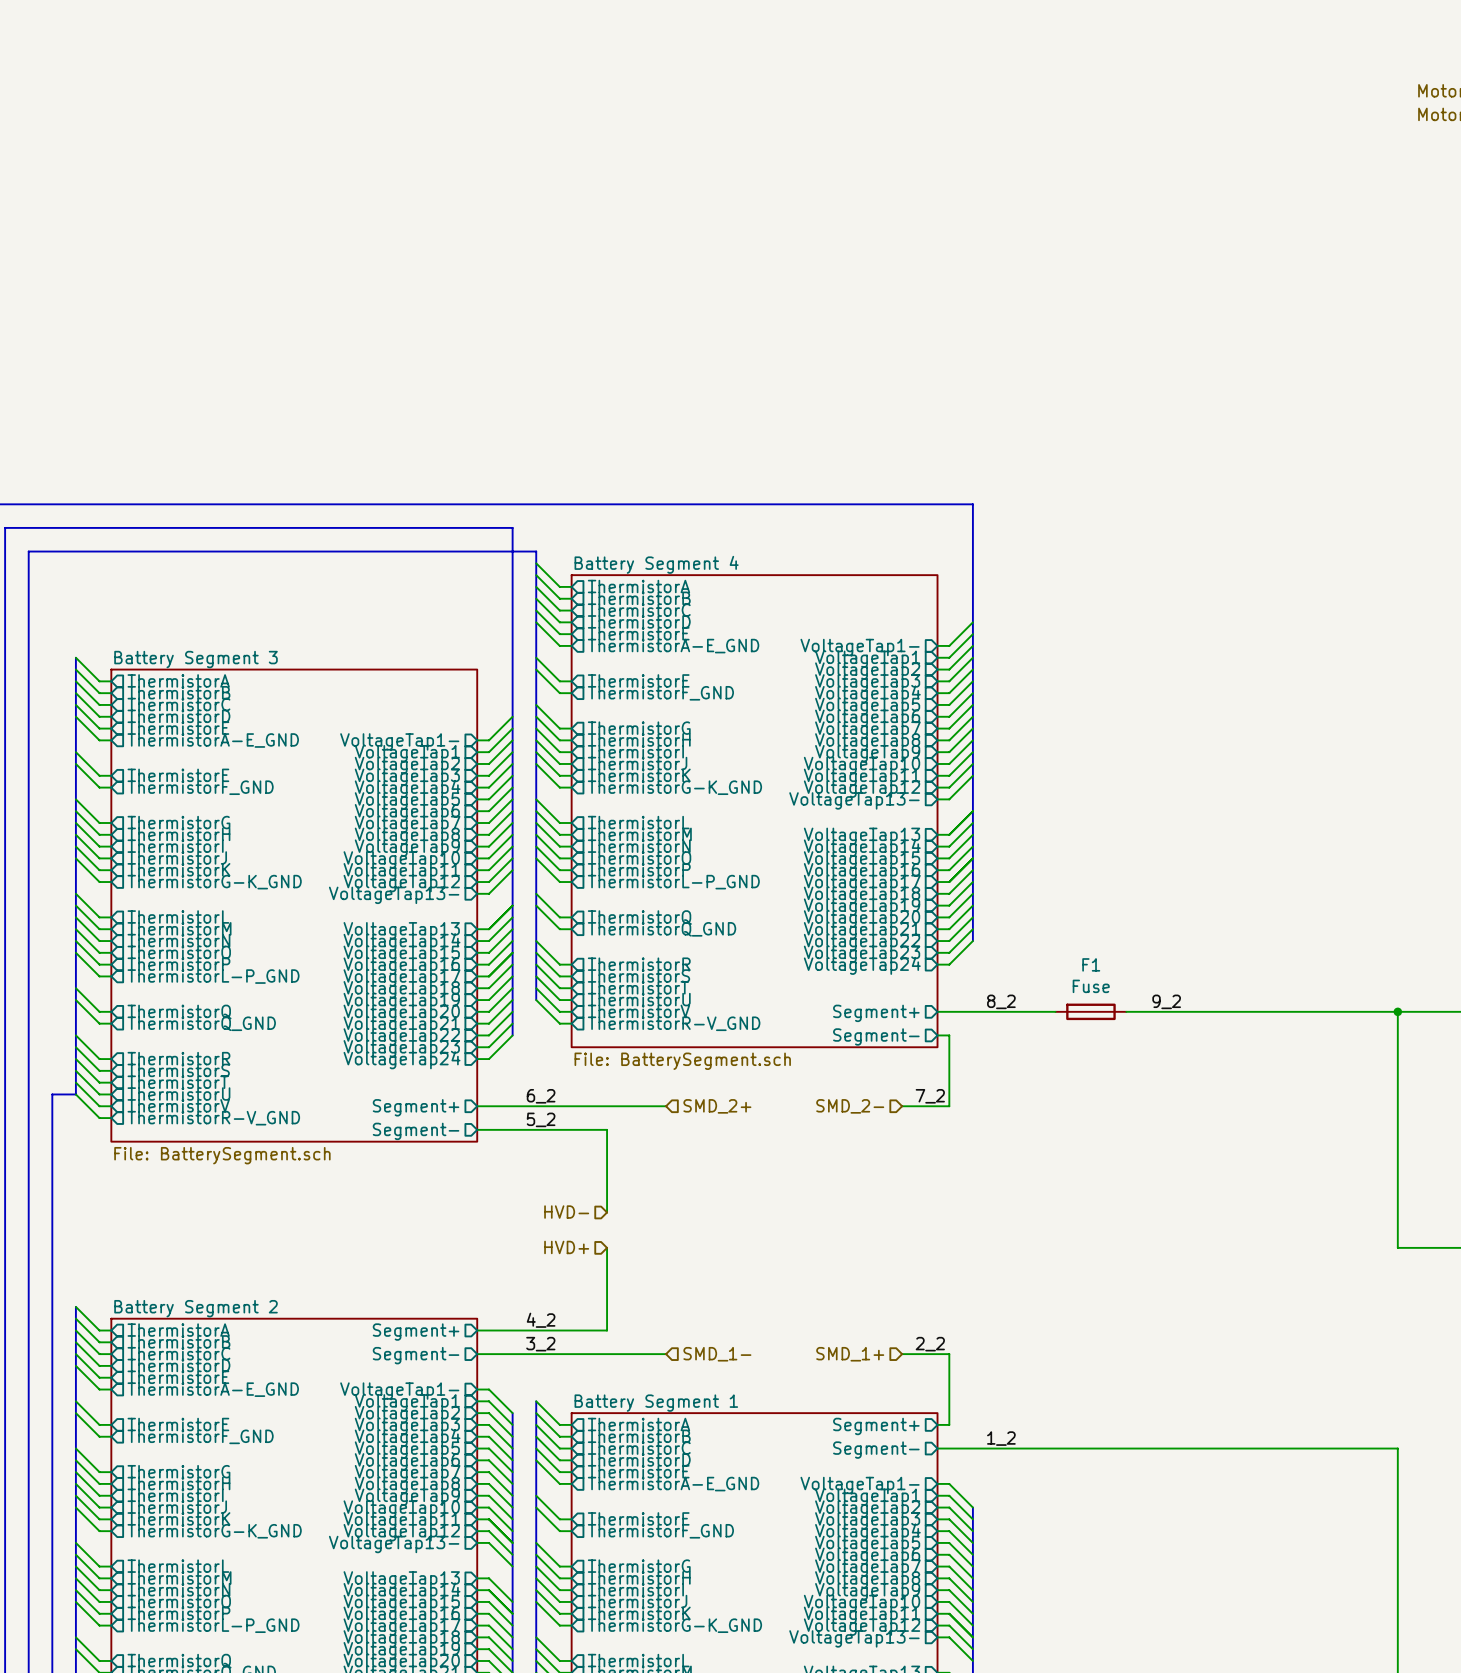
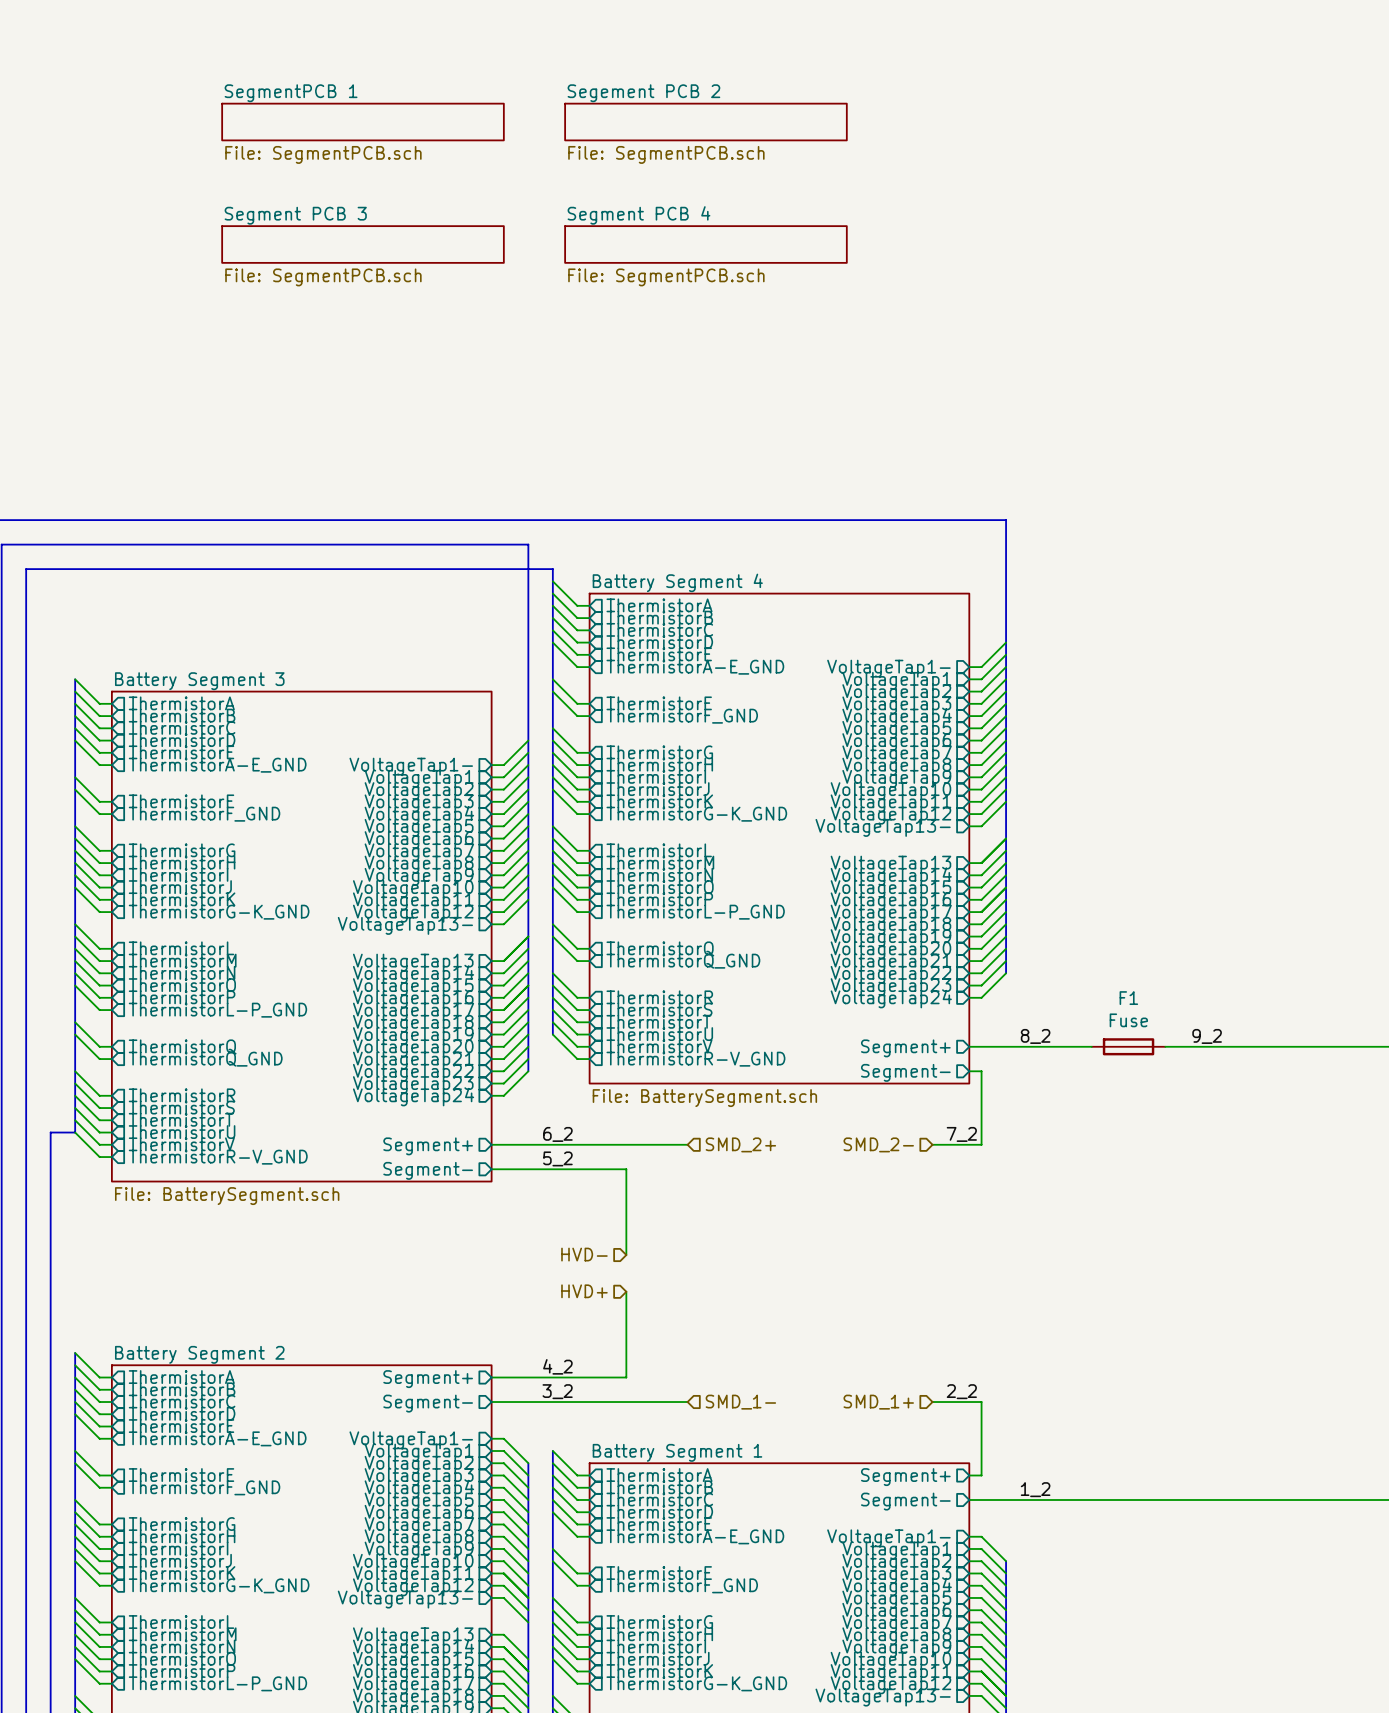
sheet SegmentPCB 1: none -> File: SegmentPCB.sch (363, 122)
sheet Segement PCB 2: none -> File: SegmentPCB.sch (705, 122)
sheet Segment PCB 3: none -> File: SegmentPCB.sch (363, 244)
sheet Segment PCB 4: none -> File: SegmentPCB.sch (705, 244)

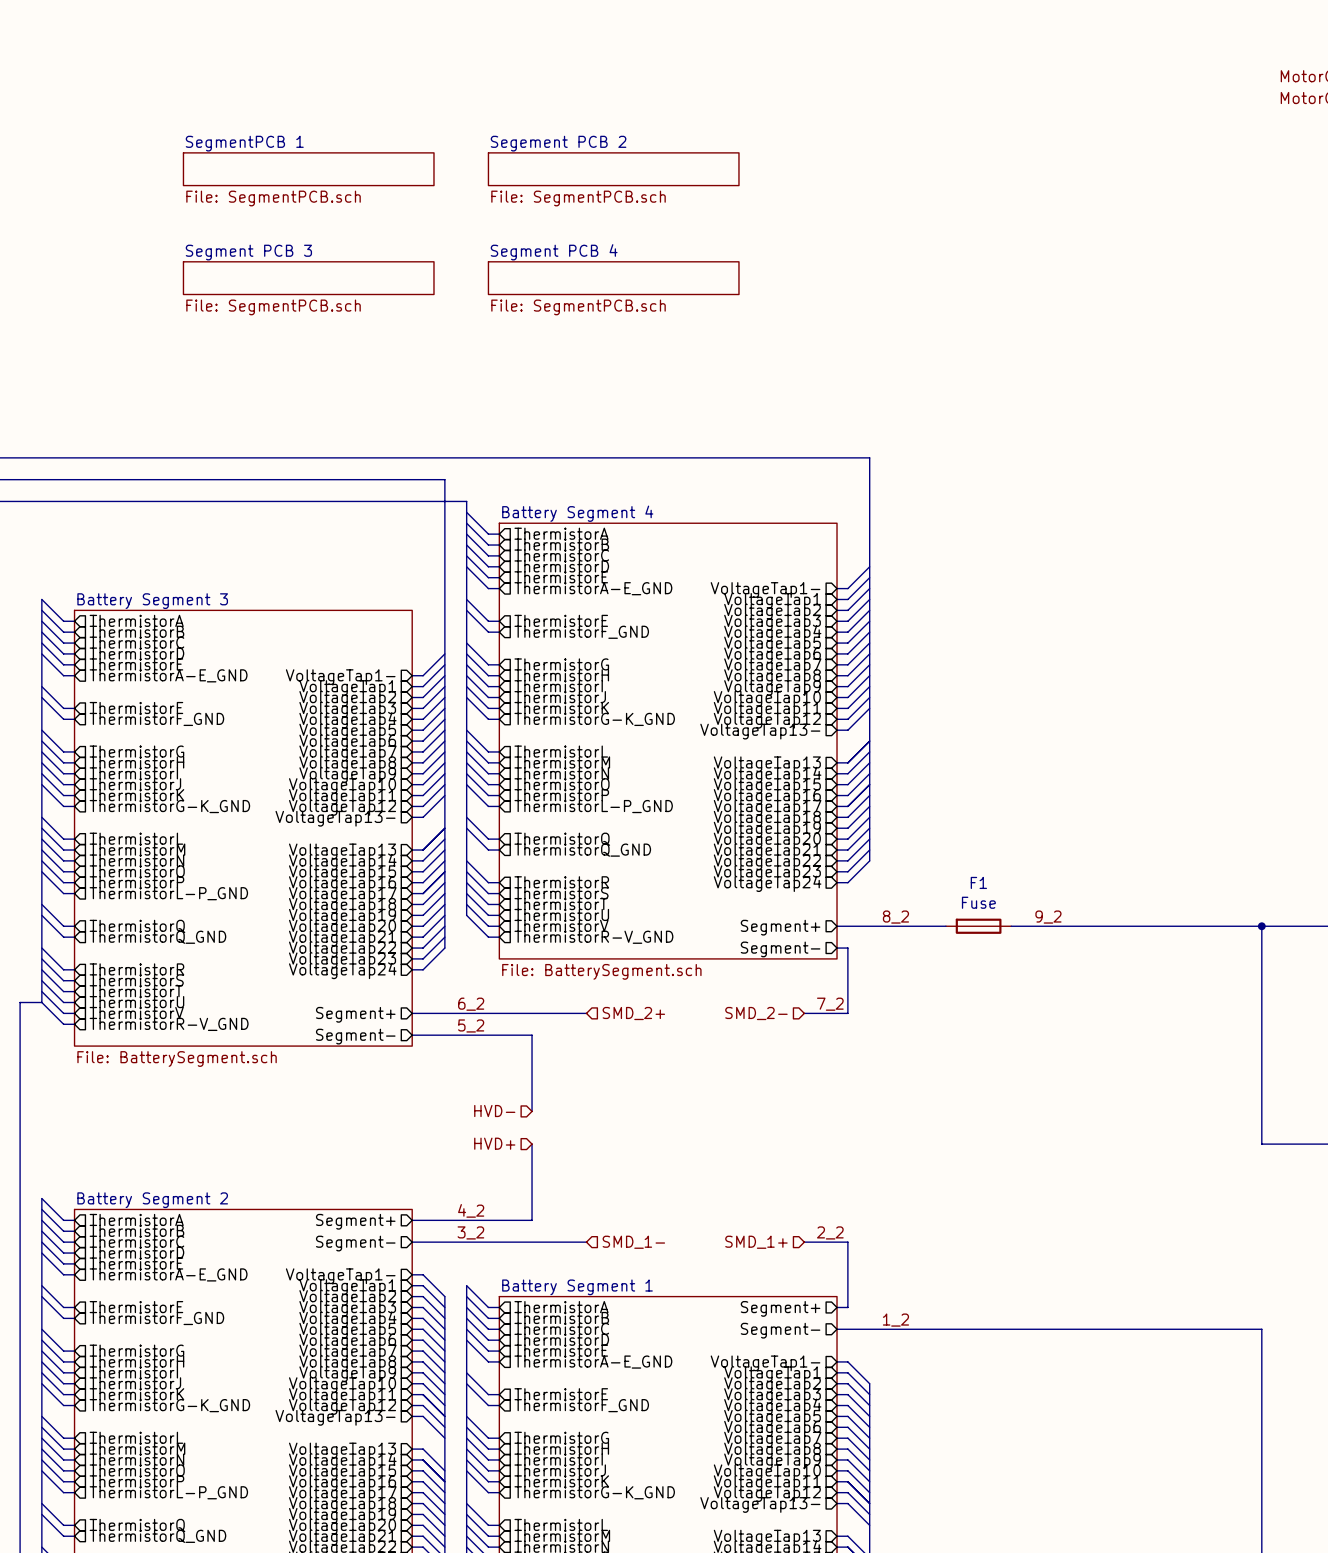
sheet SegmentPCB 1 position: (363, 122) -> (308, 169)
sheet Segement PCB 2 position: (705, 122) -> (613, 169)
sheet Segment PCB 3 position: (363, 244) -> (308, 278)
sheet Segment PCB 4 position: (705, 244) -> (613, 278)

